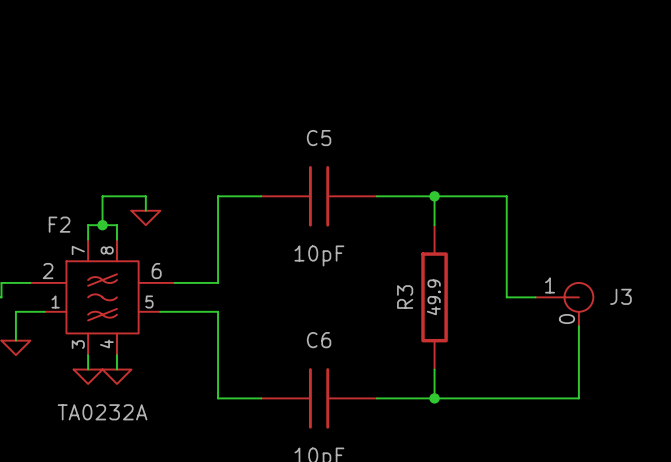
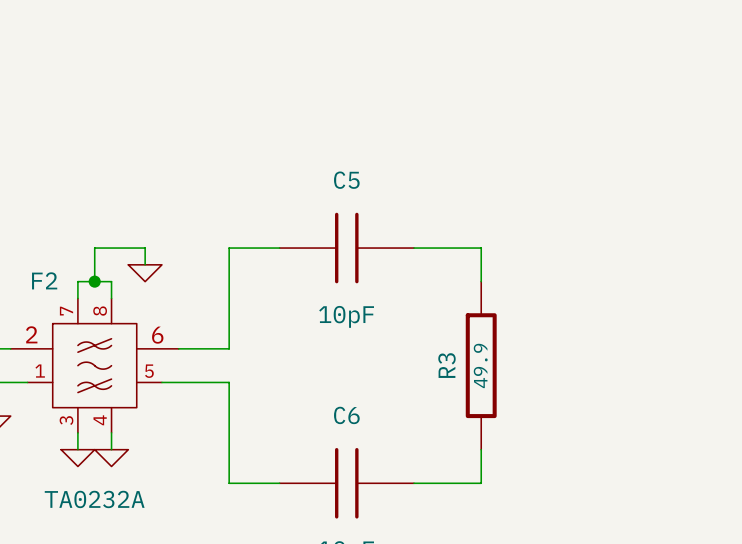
wire: (434, 196) (506, 196) (506, 297) (535, 297) -> none
junction: (434, 196) -> none
J3: (564, 304) -> none
wire: (578, 326) (578, 398) (434, 398) -> none
junction: (434, 398) -> none

